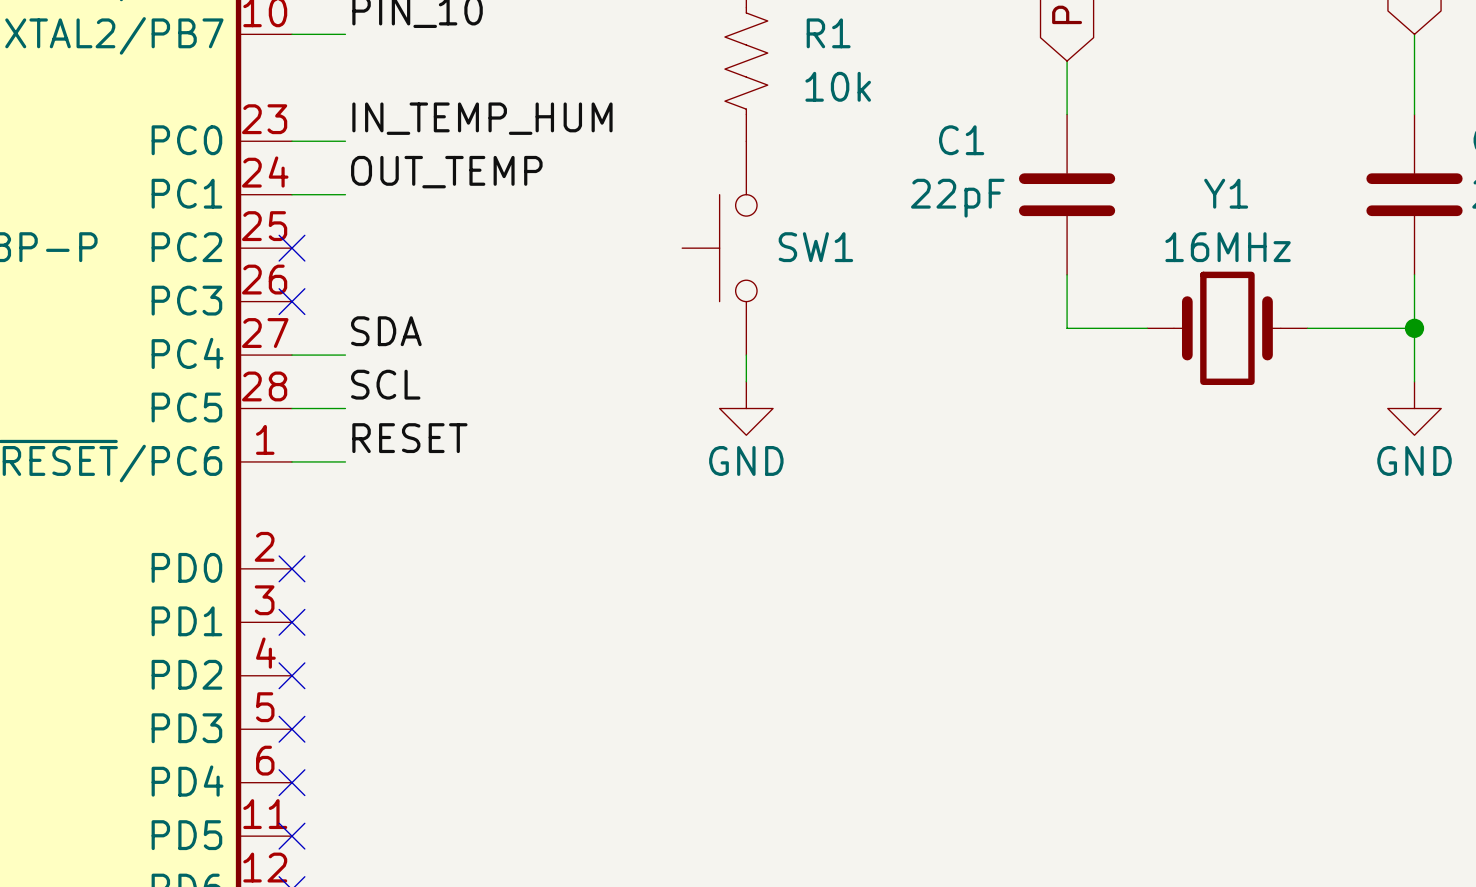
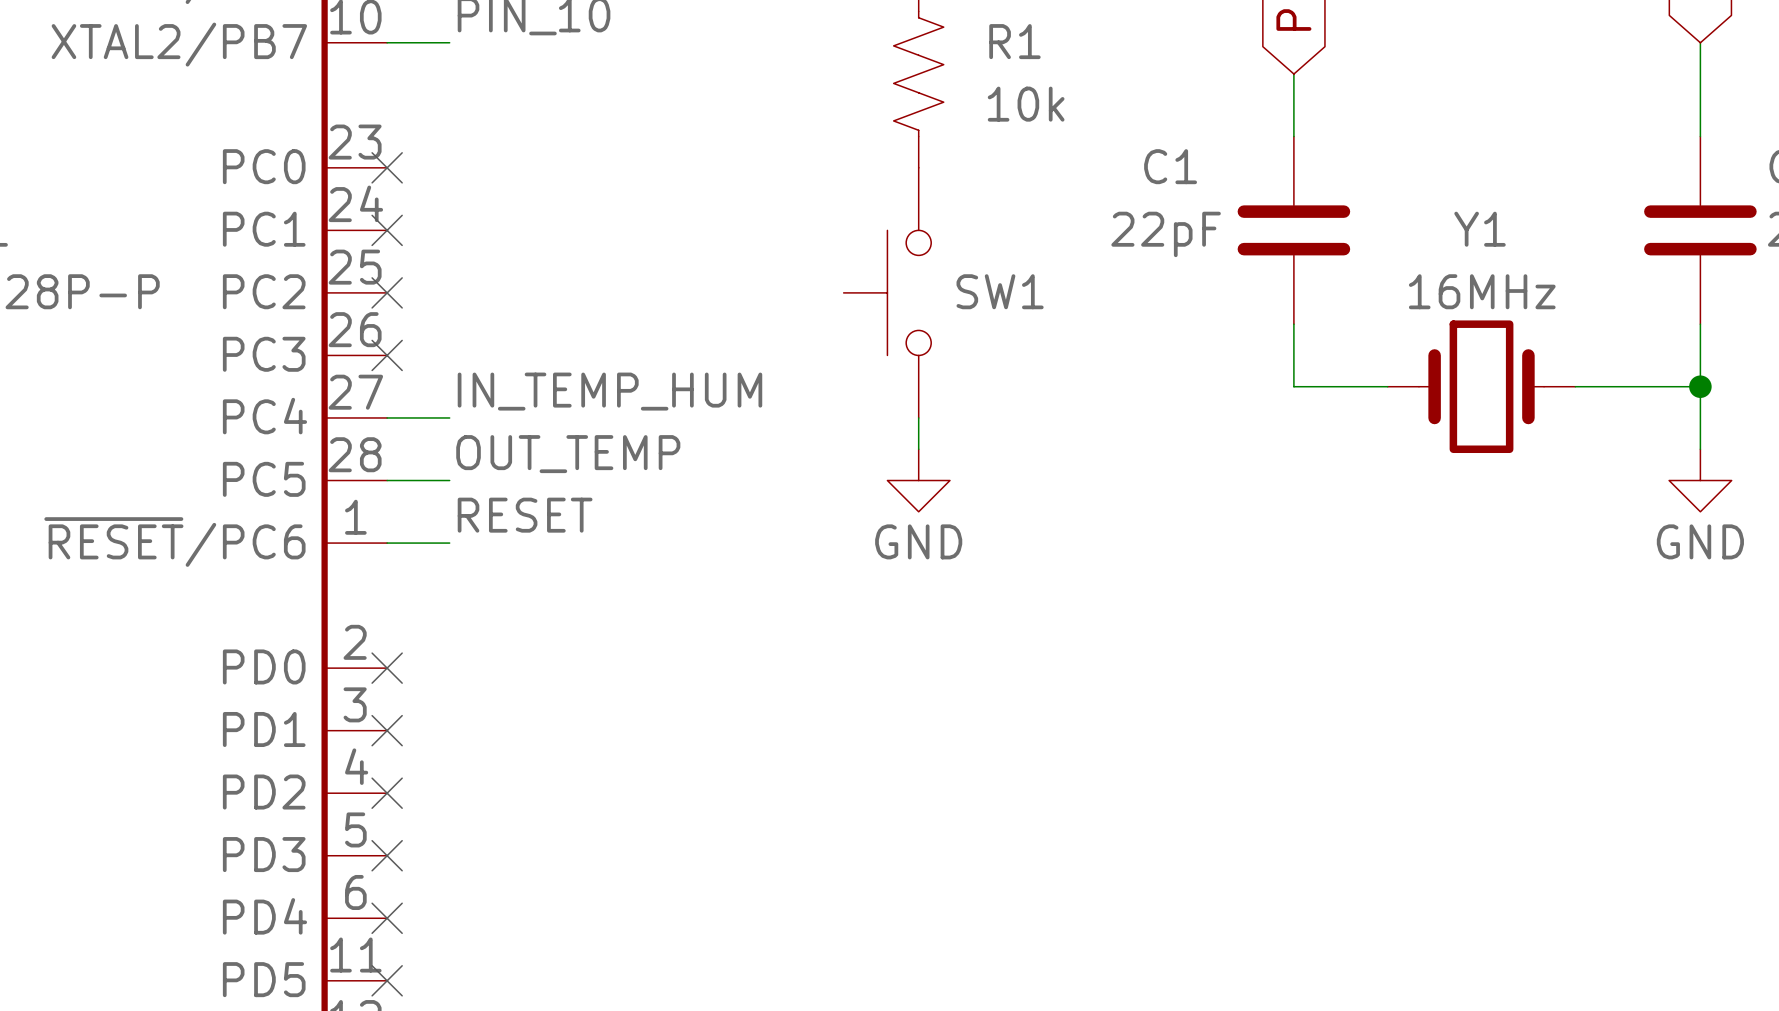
label: IN_TEMP_HUM (482, 118) -> none
wire: (291, 141) (345, 141) -> none
no-connect mark: none -> (387, 167)
label: OUT_TEMP (446, 172) -> none
wire: (291, 194) (345, 194) -> none
no-connect mark: none -> (387, 230)
label: SDA (386, 331) -> IN_TEMP_HUM (609, 391)
label: SCL (385, 384) -> OUT_TEMP (568, 454)

